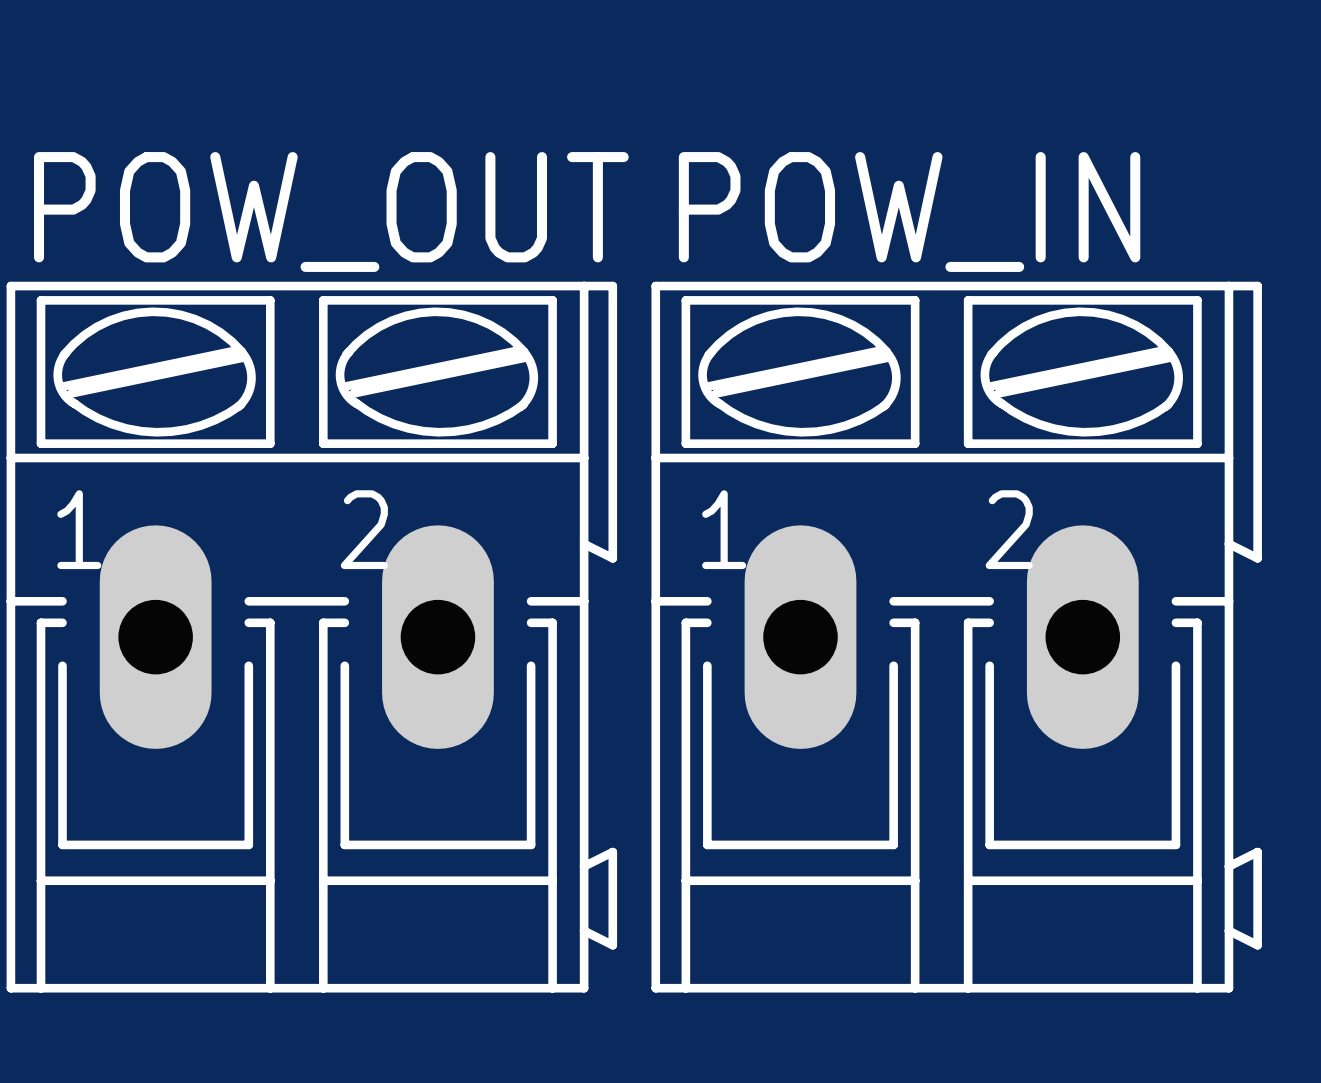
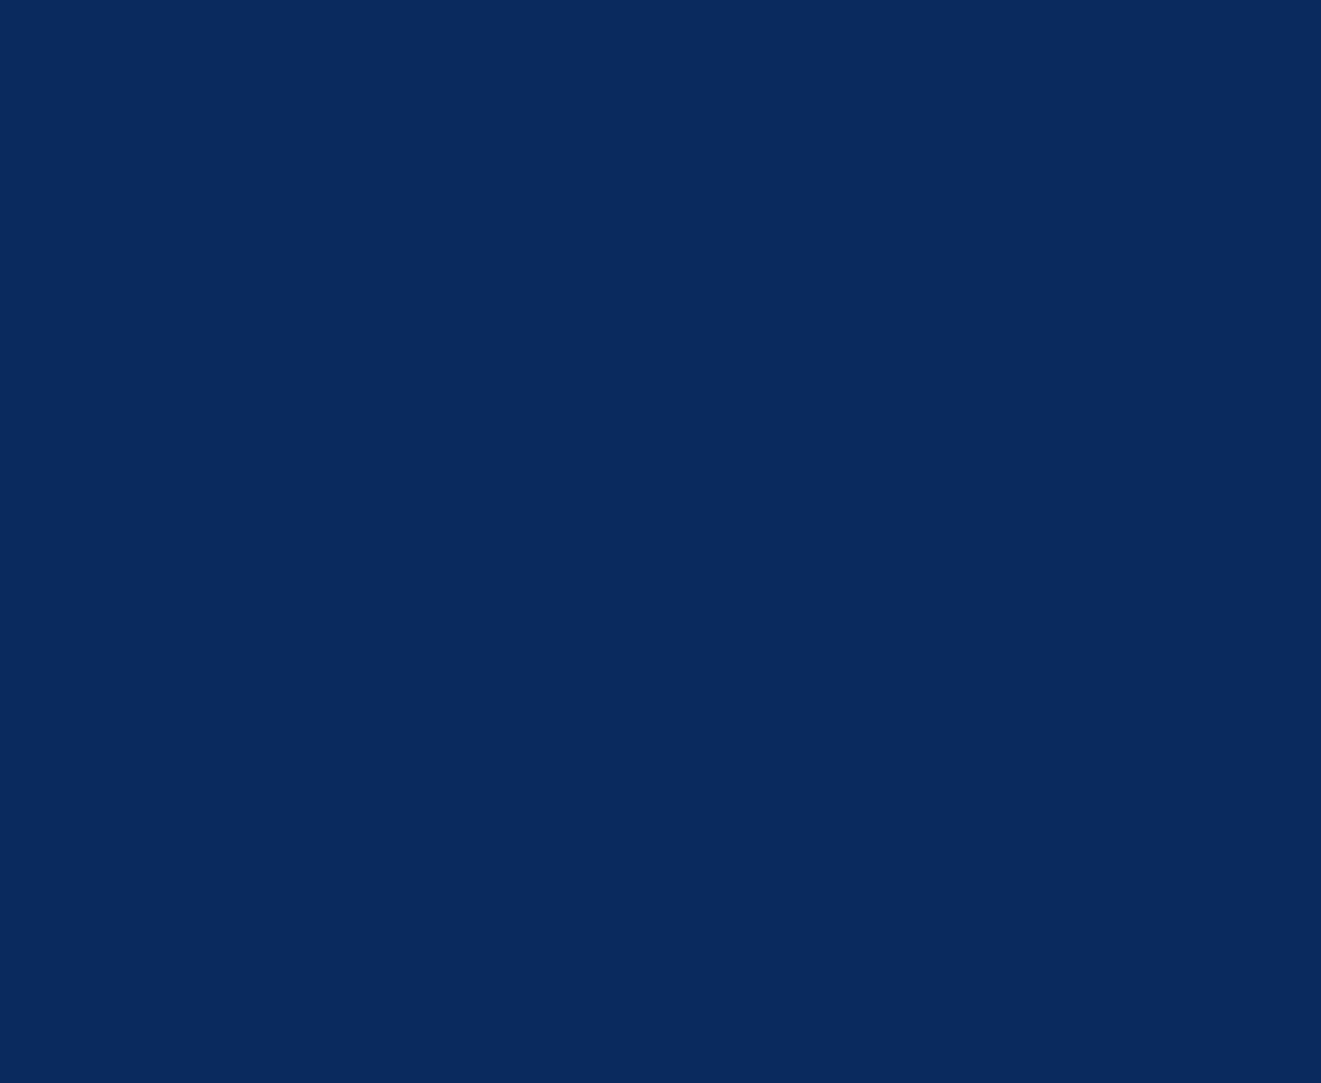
POW_OUT: (311, 637) -> none
POW_IN: (956, 637) -> none

